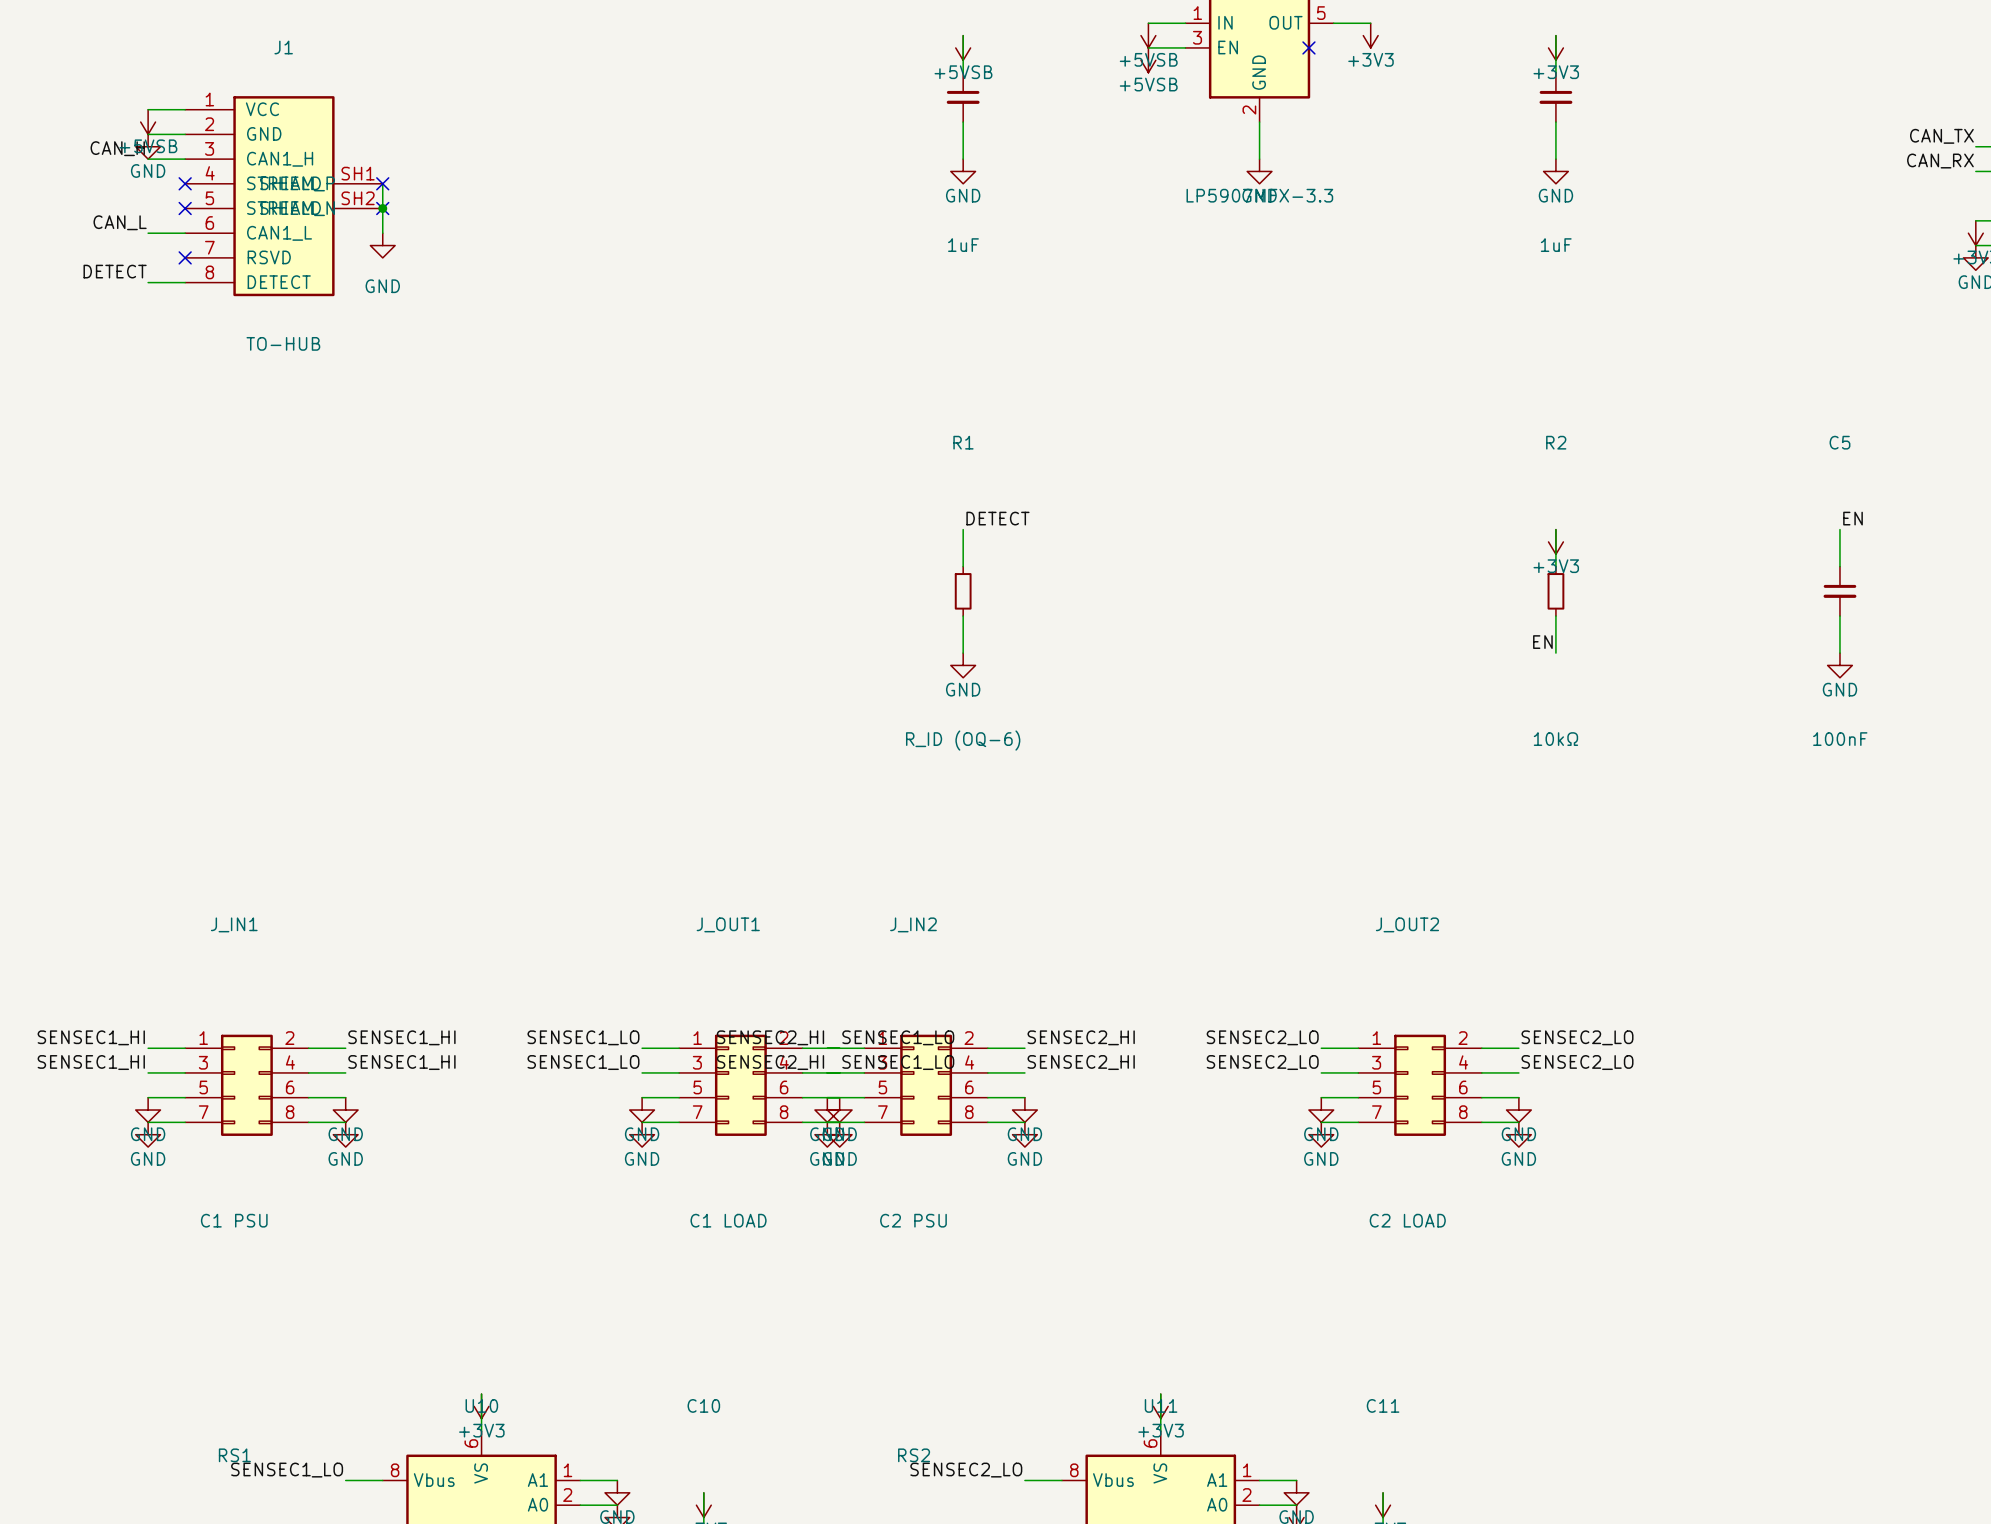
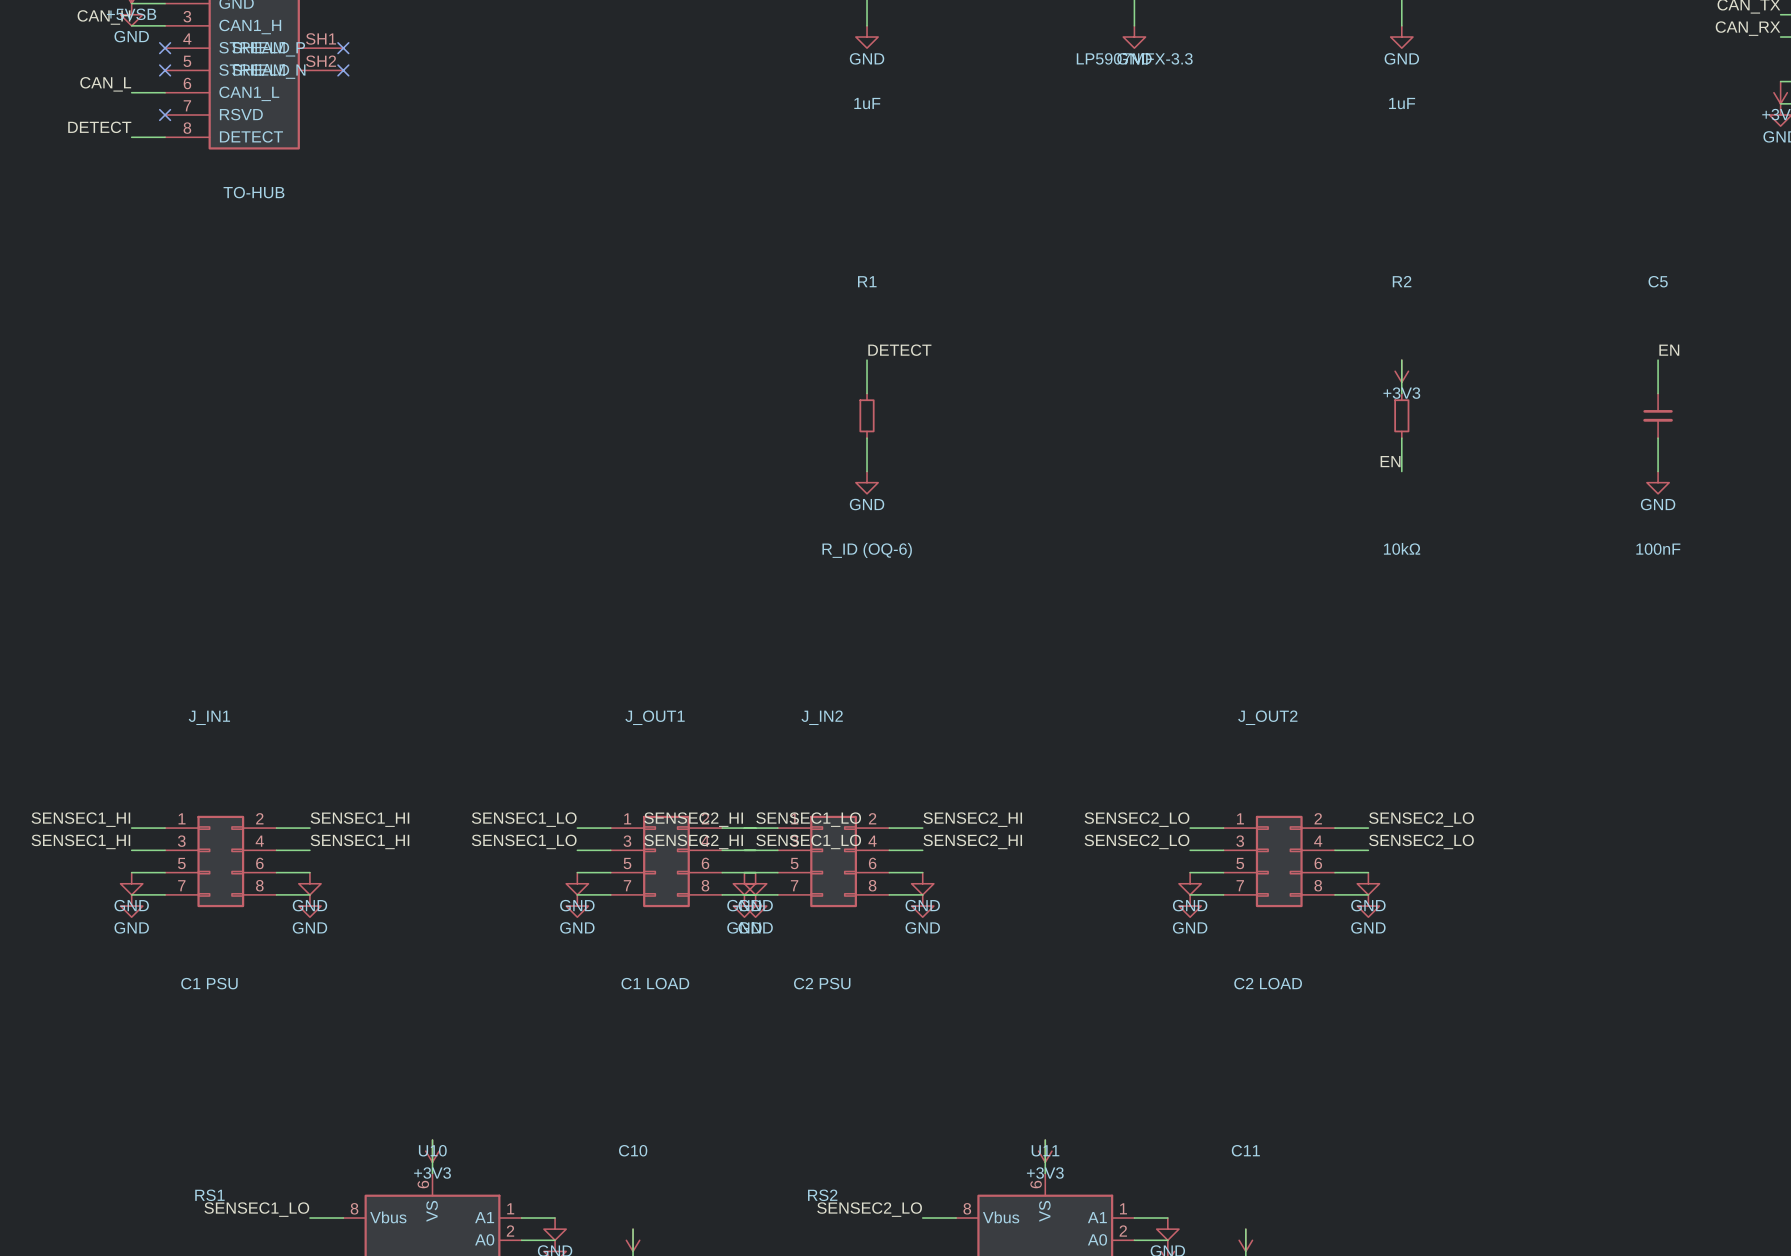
wire: (382, 183) (382, 233) -> none
junction: (382, 208) -> none
power symbol: GND (382, 245) -> none

